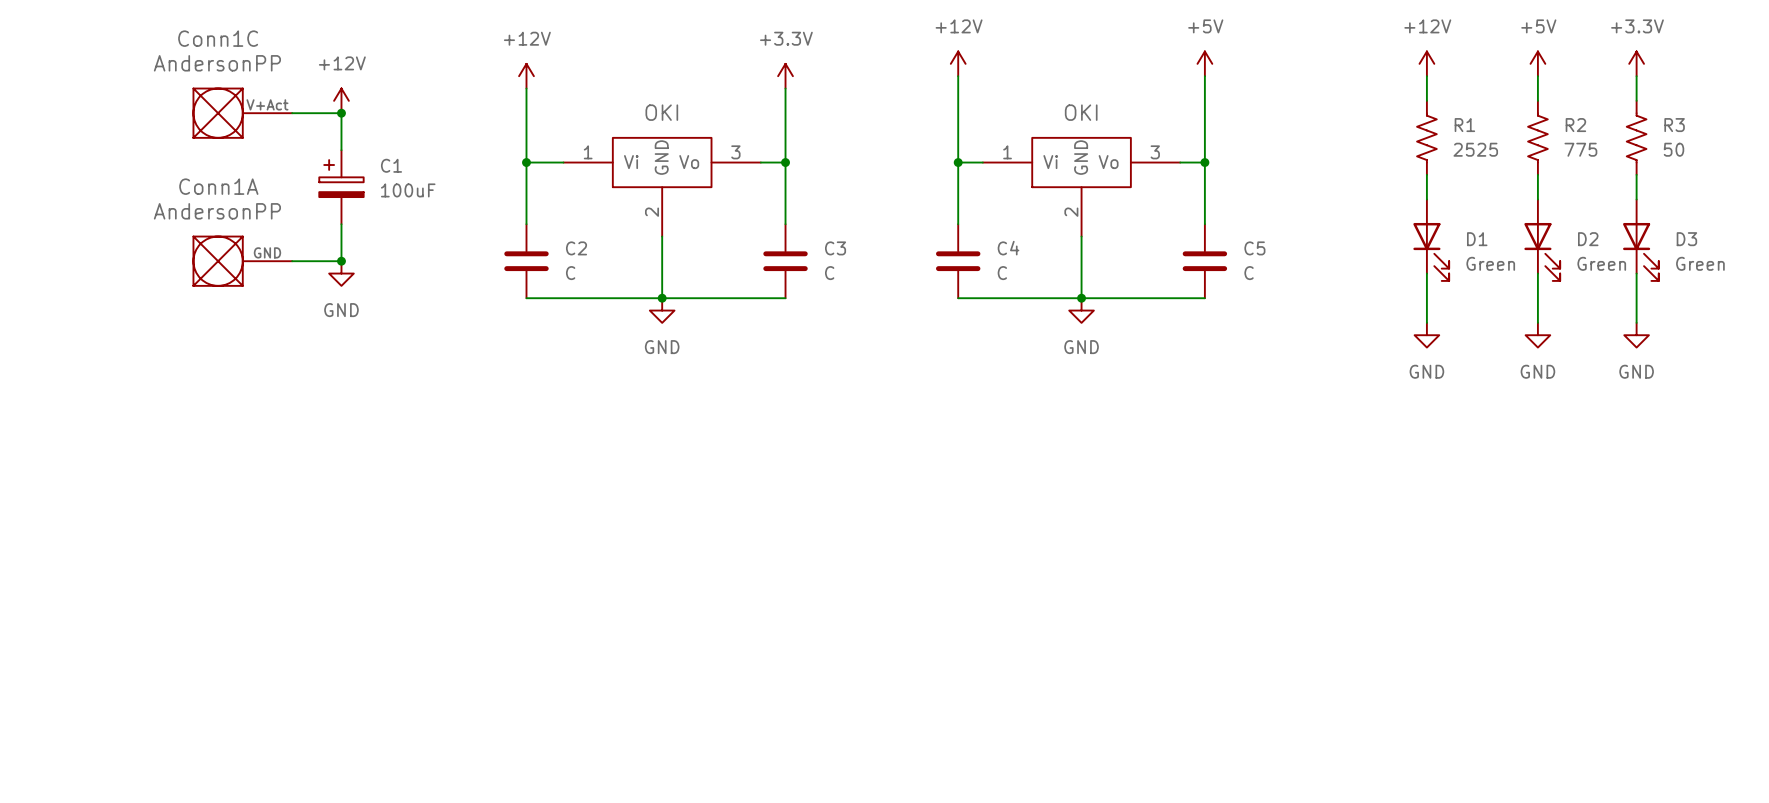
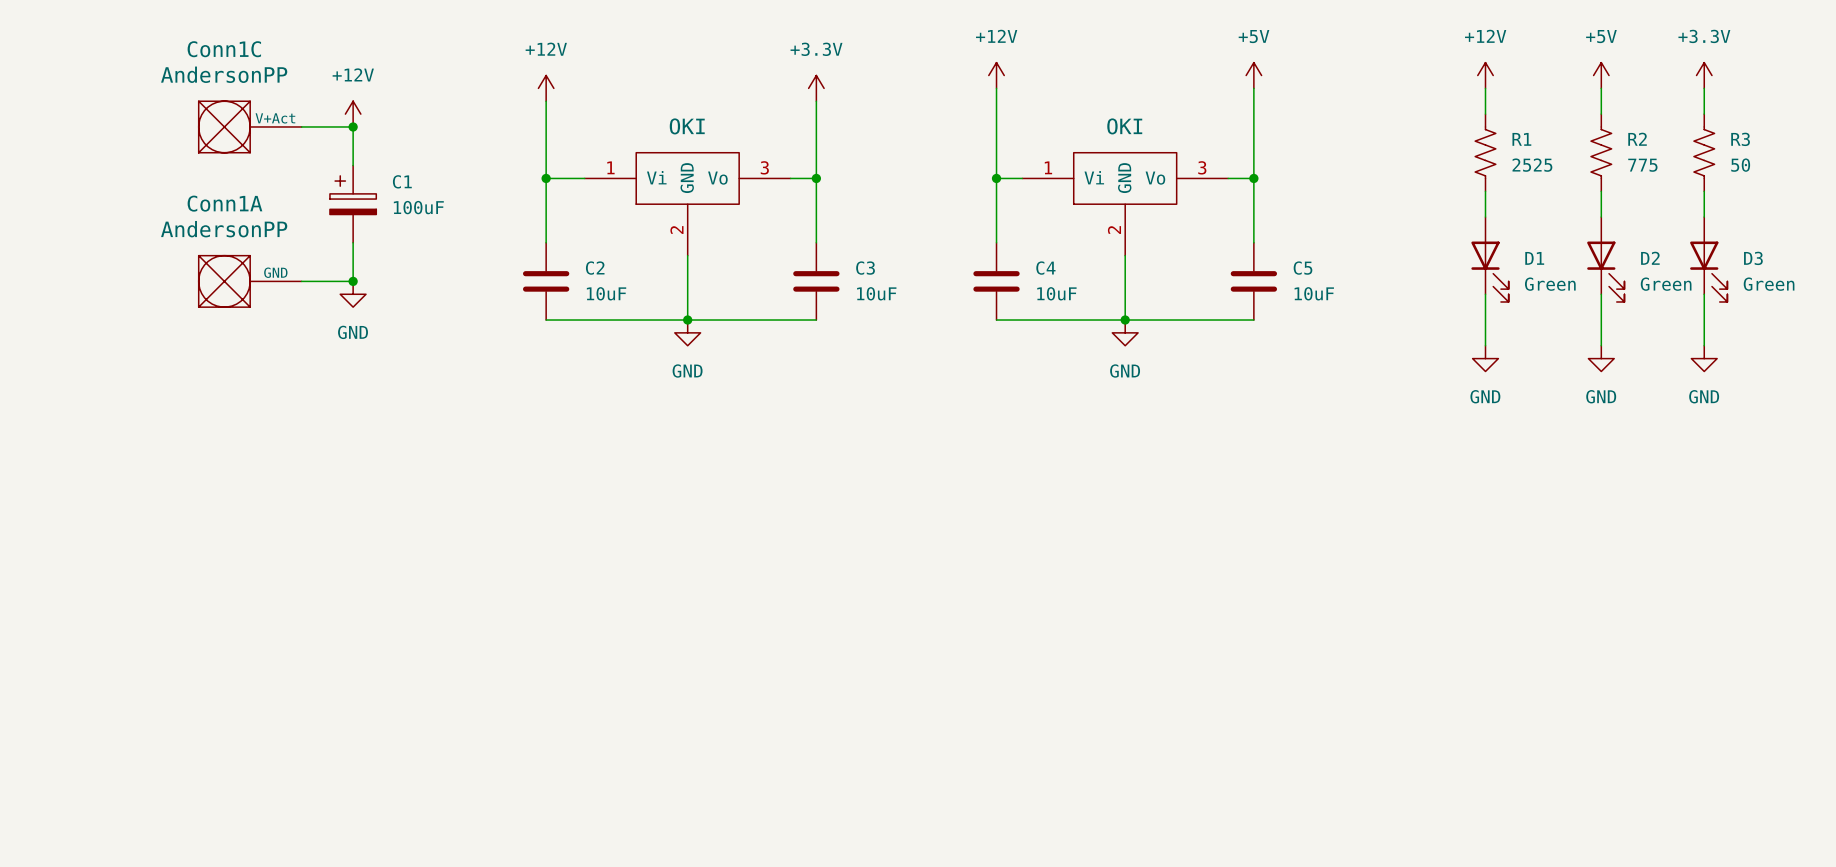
C2 value: C (570, 273) -> 10uF (606, 293)
C3 value: C (829, 273) -> 10uF (876, 293)
C4 value: C (1002, 273) -> 10uF (1056, 293)
C5 value: C (1249, 273) -> 10uF (1314, 293)

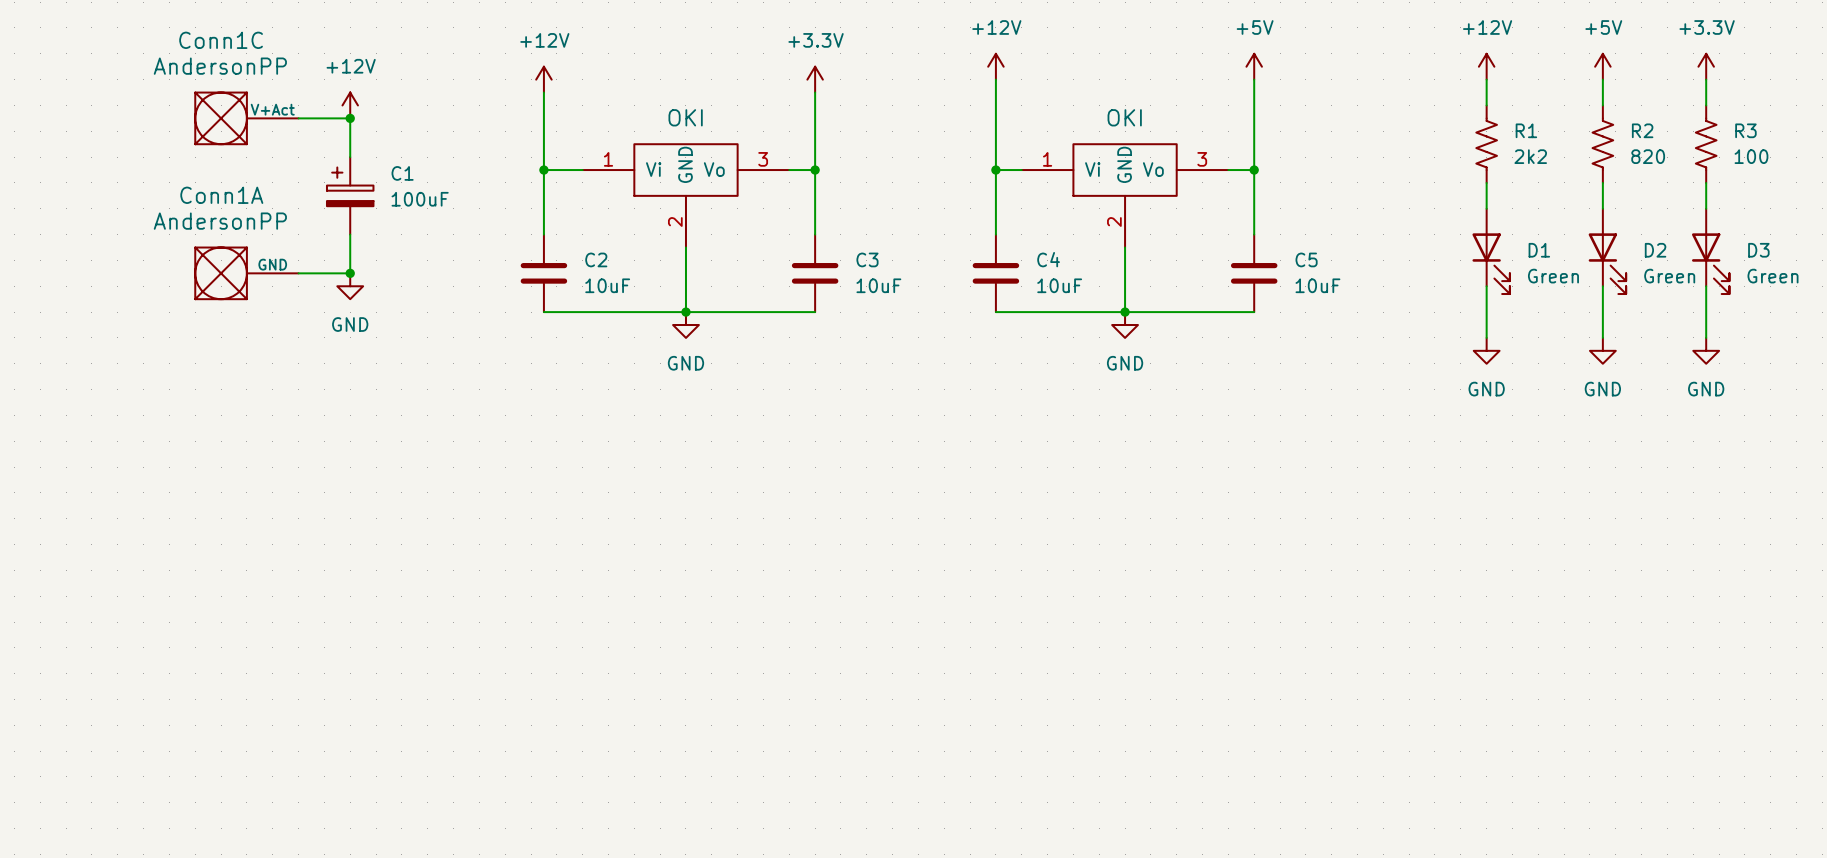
R1 value: 2525 (1532, 165) -> 2k2 (1530, 156)
R2 value: 775 (1642, 165) -> 820 (1648, 156)
R3 value: 50 (1740, 165) -> 100 (1751, 156)

